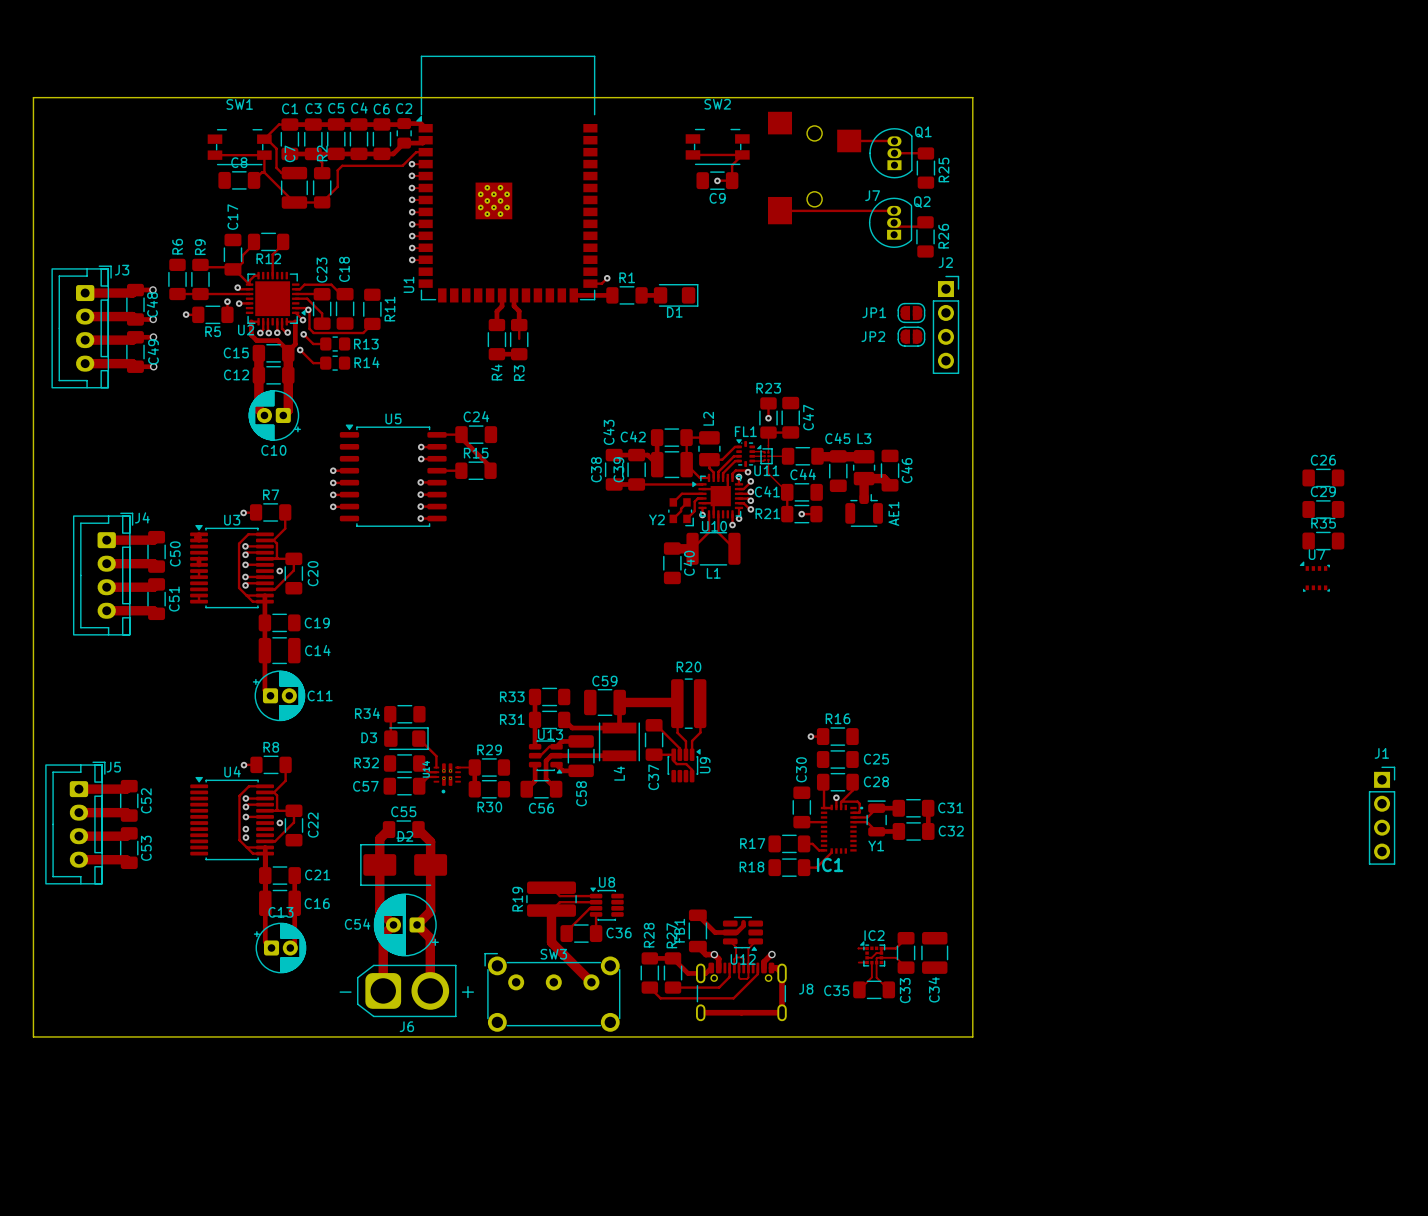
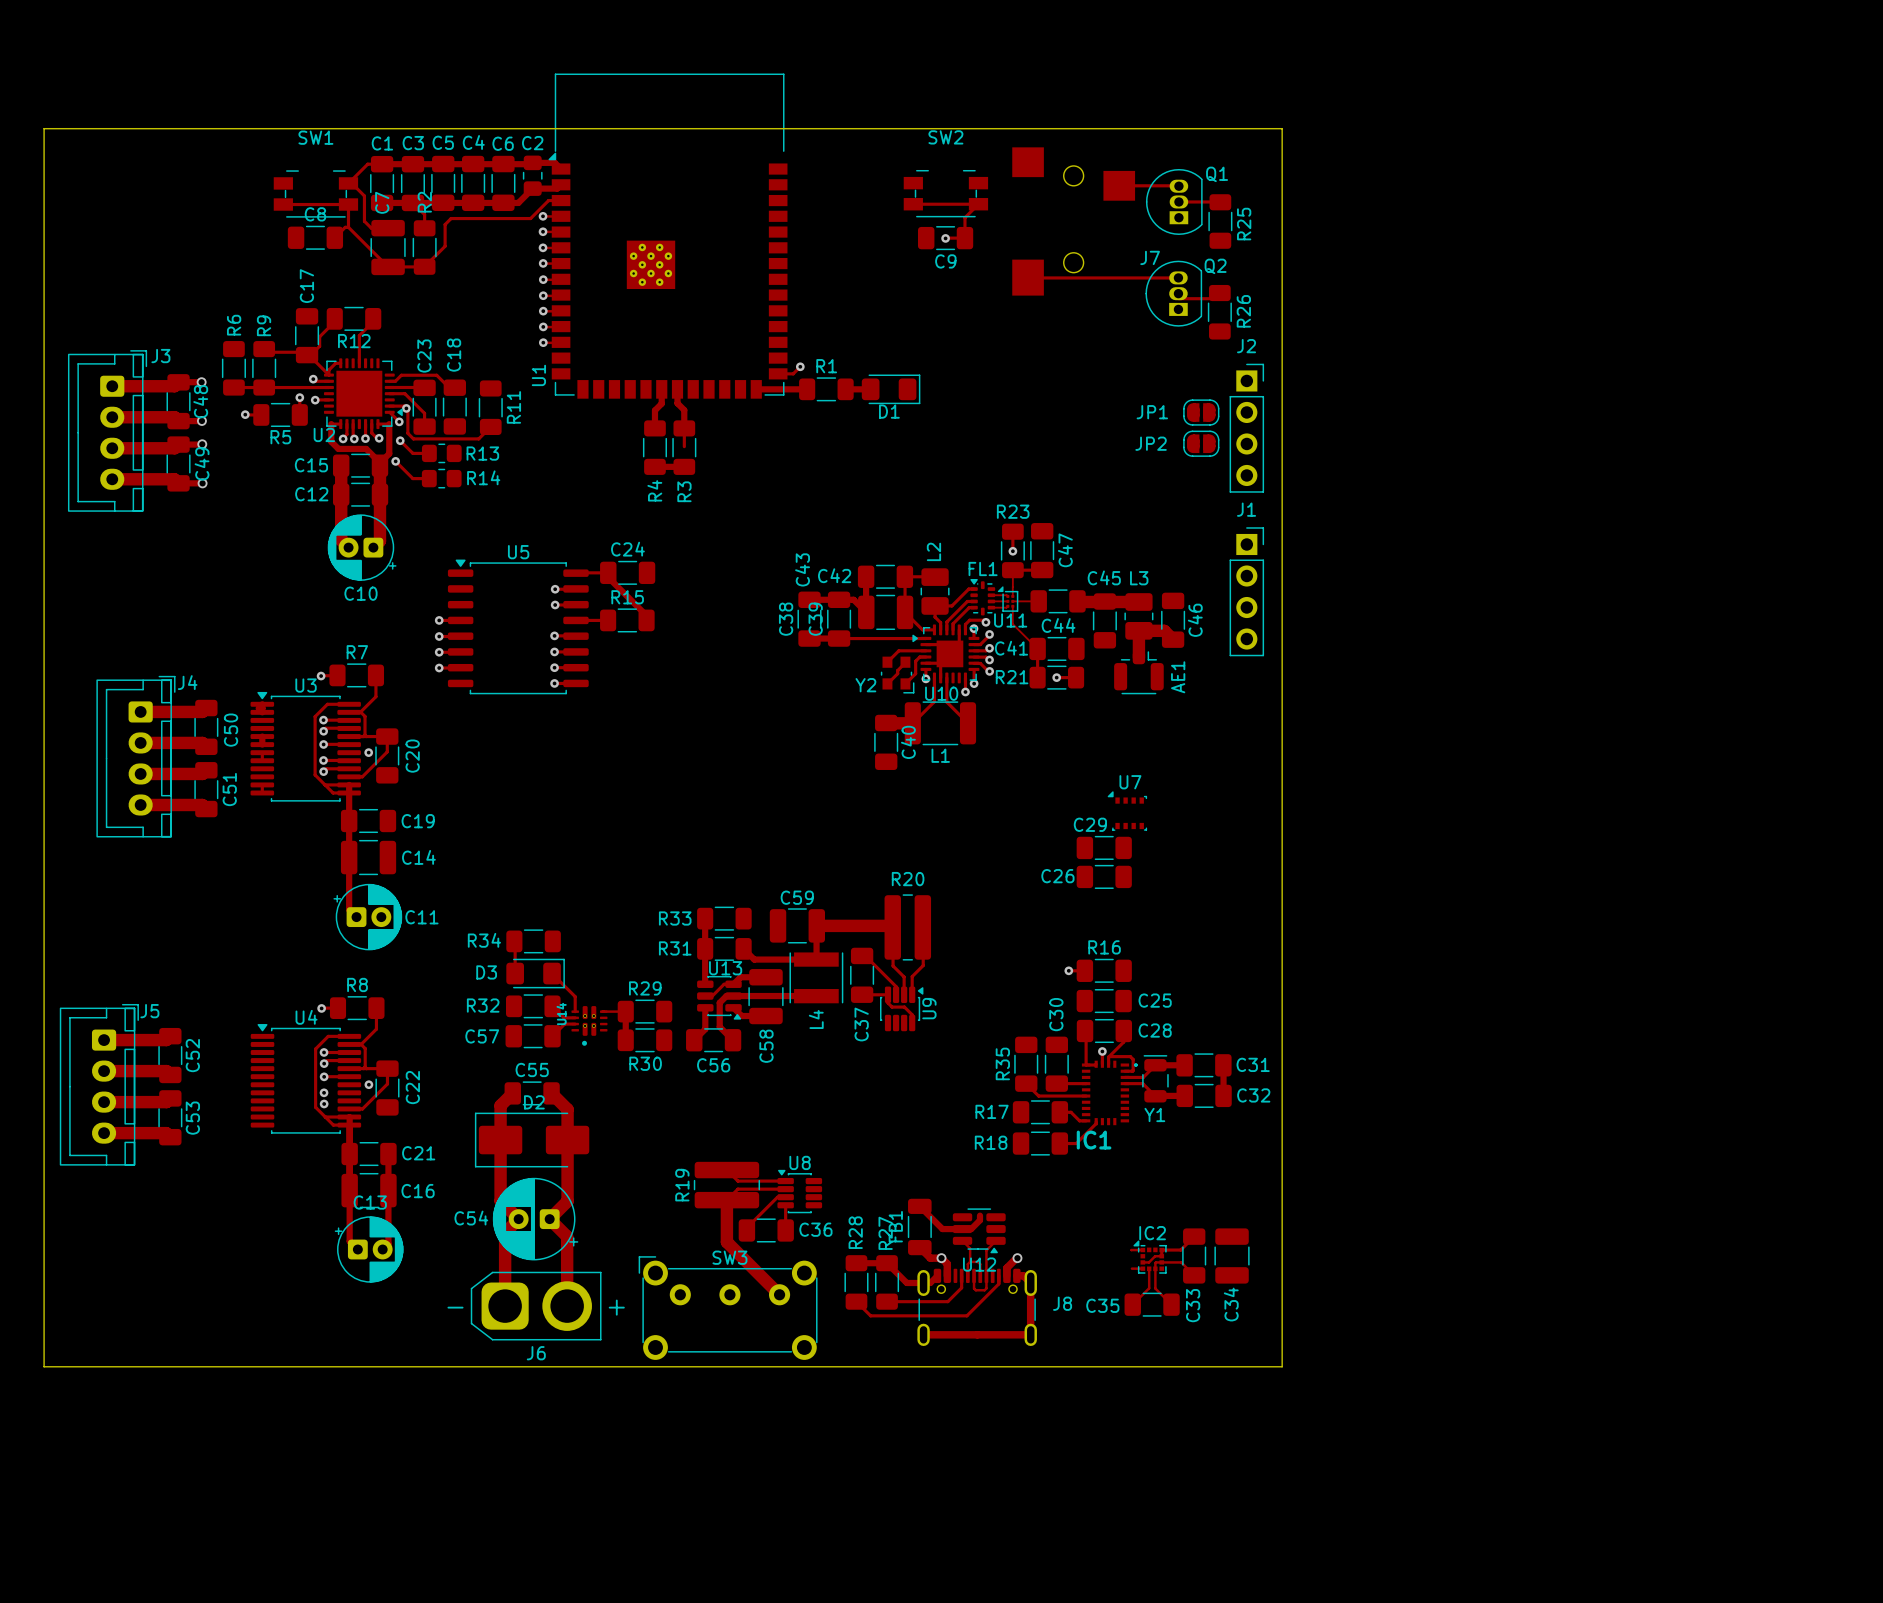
C26 name position: C26 (1323, 460) -> C26 (1057, 876)
C26 position: (1323, 477) -> (1104, 876)
C29 name position: C29 (1323, 491) -> C29 (1090, 824)
C29 position: (1323, 509) -> (1104, 847)
R35 name position: R35 (1323, 523) -> R35 (1002, 1063)
R35 rotation: 0° (1323, 541) -> 90° clockwise (1026, 1064)
R35 position: (1323, 541) -> (1026, 1064)
U7 position: (1314, 576) -> (1127, 811)
J1 position: (1382, 815) -> (1246, 591)
track: none -> (1026, 1083) (1038, 1096) (1086, 1096)

